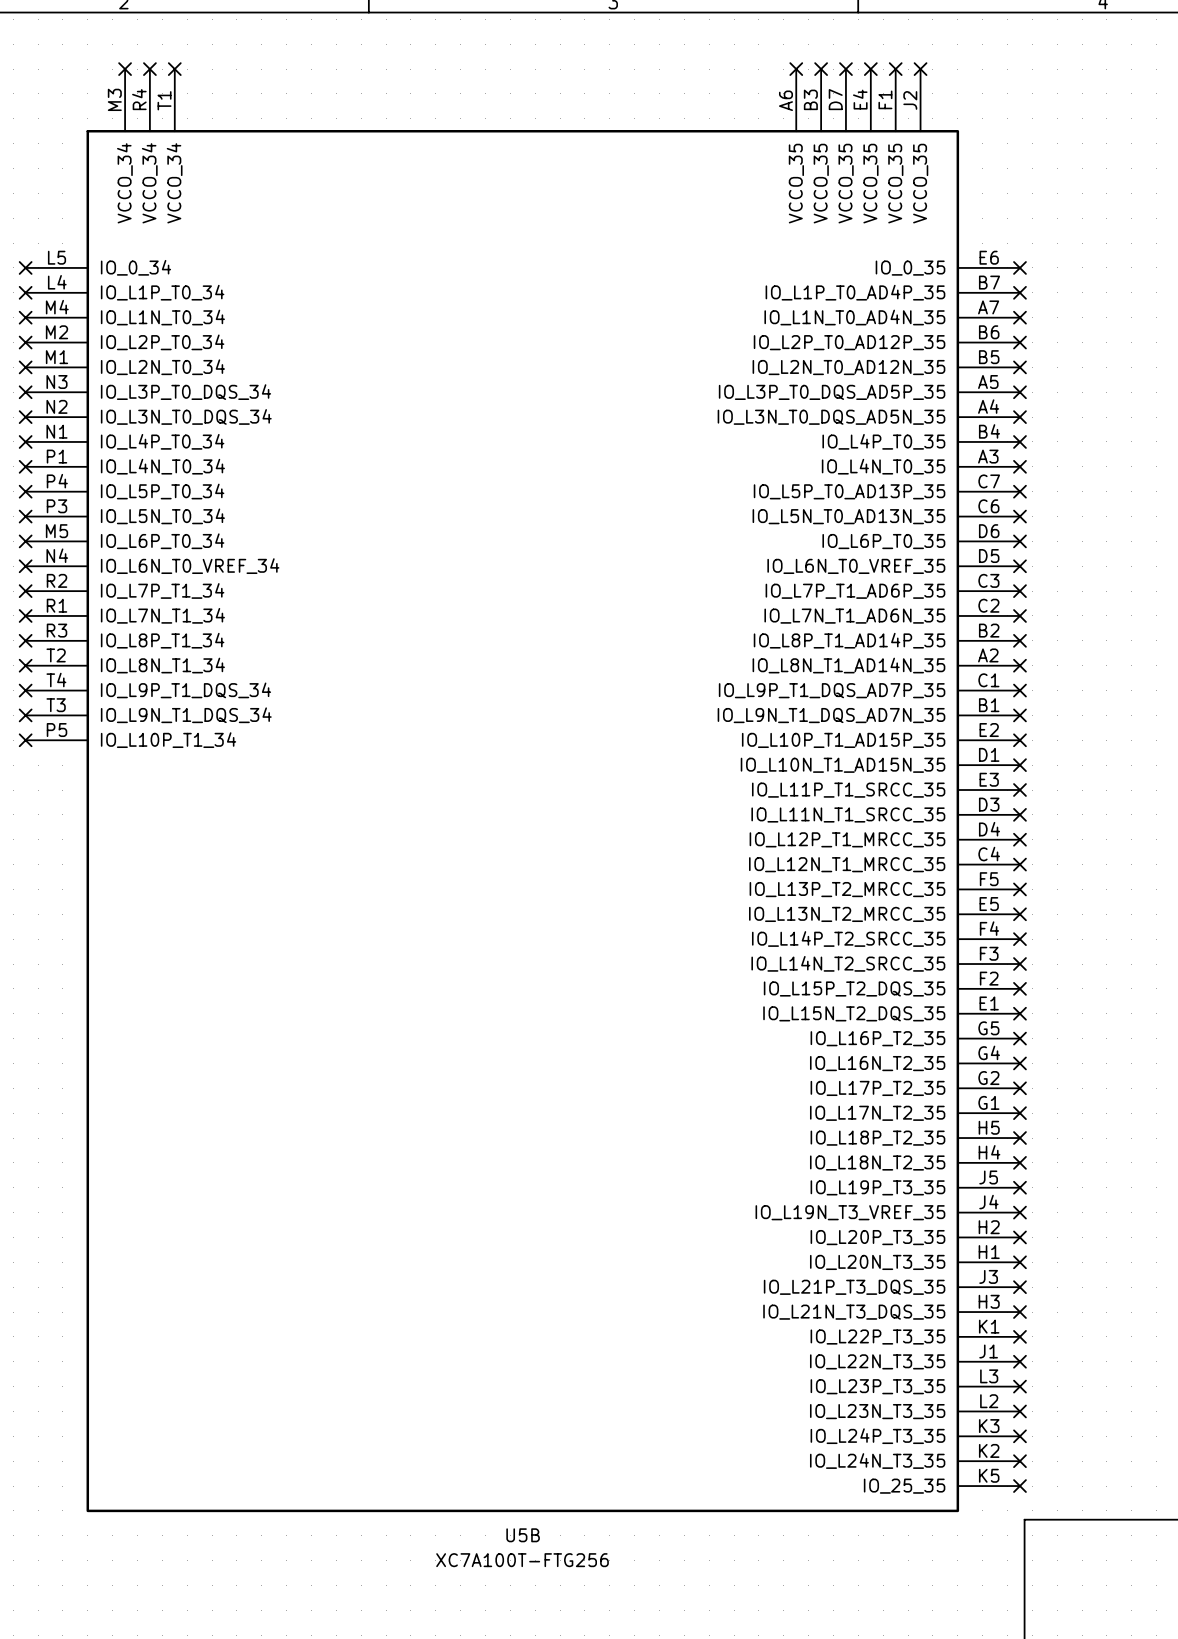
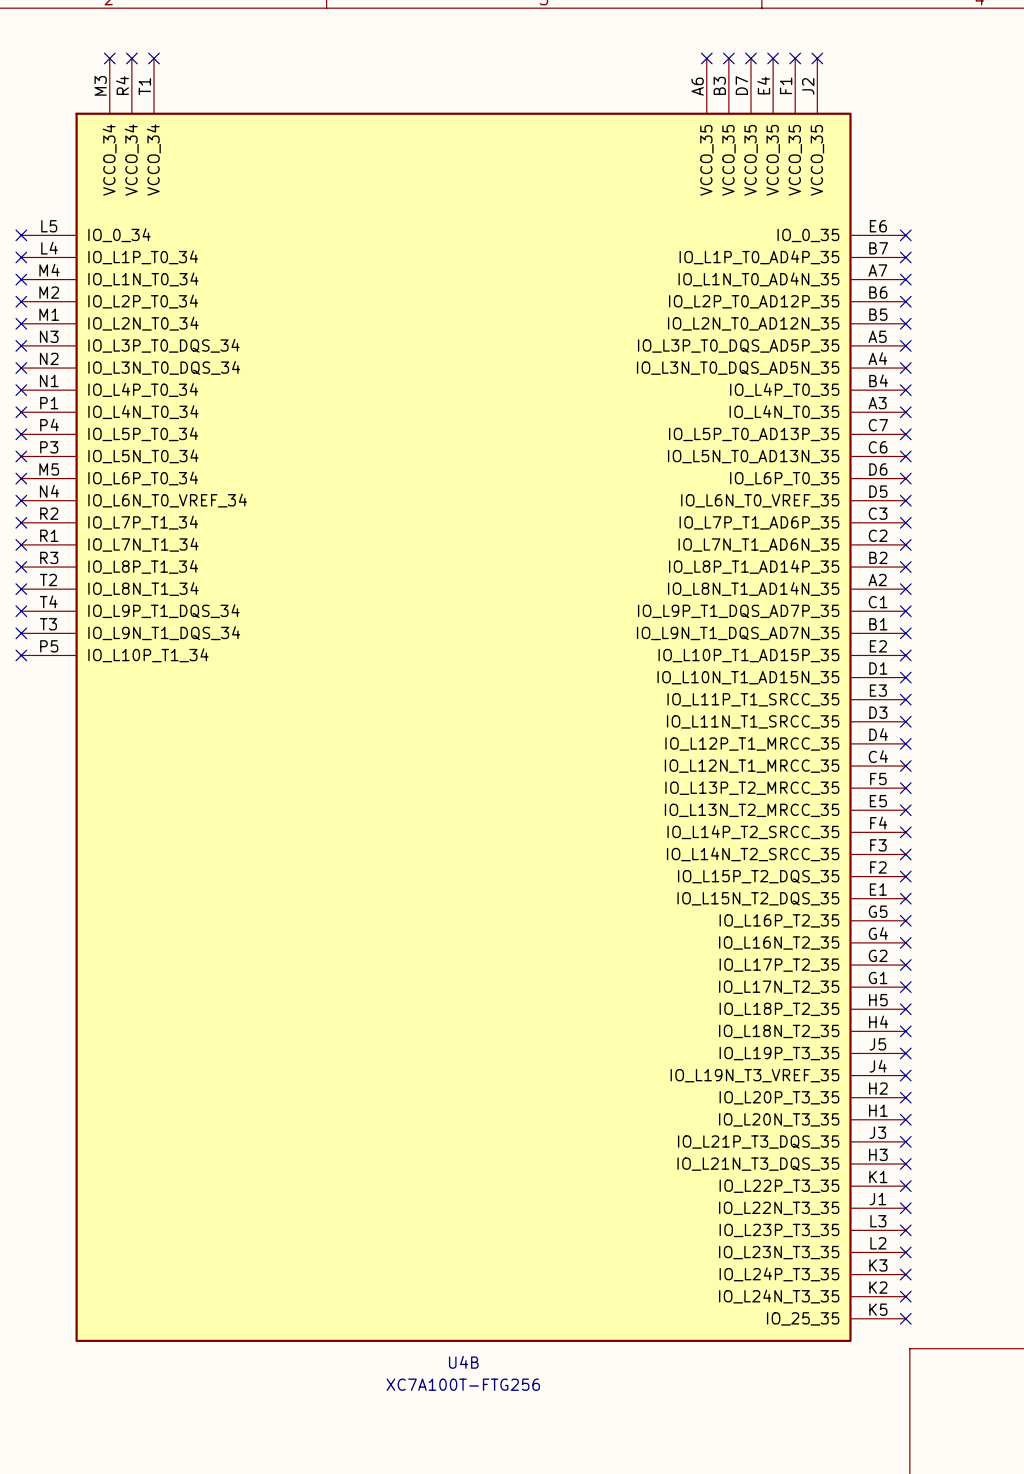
U5B name: U5B (523, 1535) -> U4B (463, 1362)

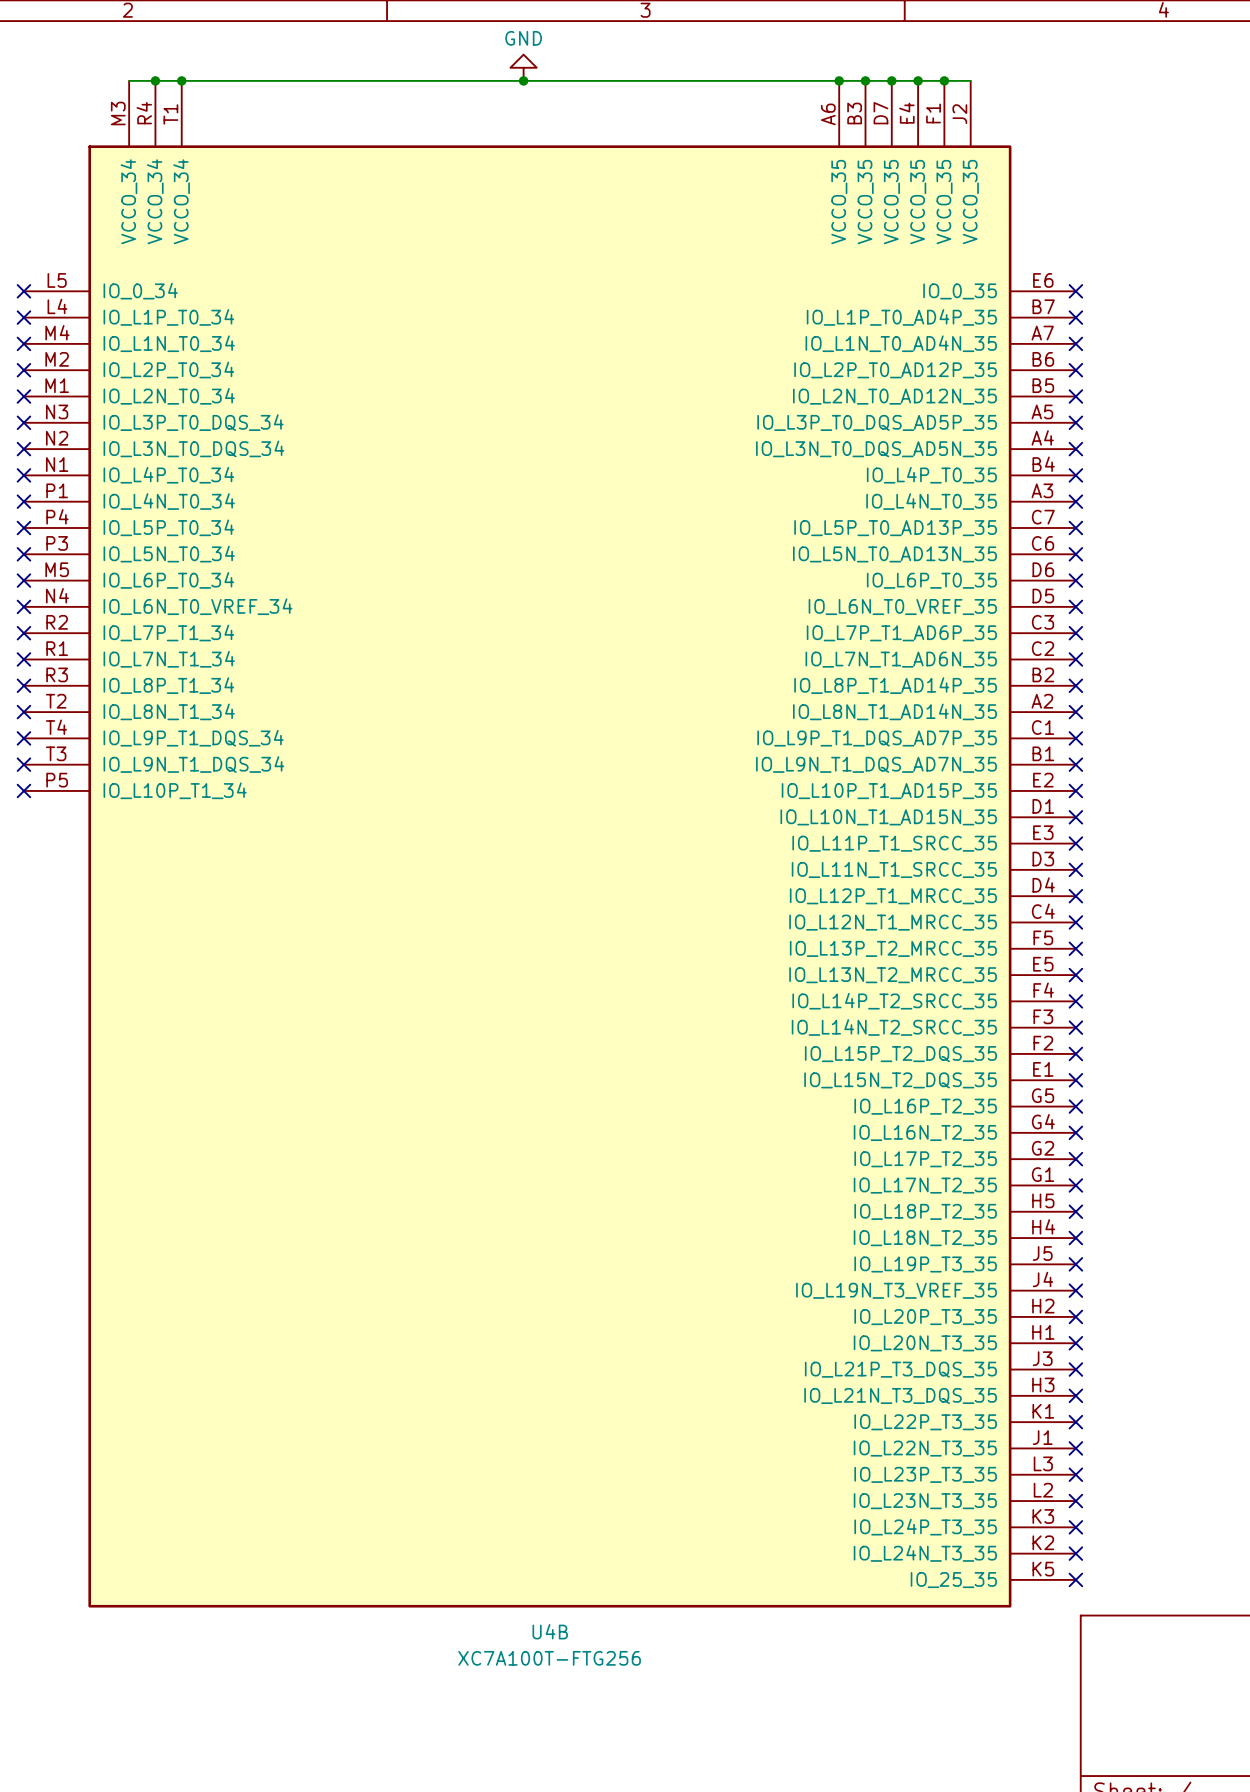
power symbol: none -> GND (523, 67)
wire: none -> (129, 80) (970, 80)
no-connect mark: (109, 58) -> none
no-connect mark: (131, 58) -> none
junction: none -> (155, 80)
no-connect mark: (153, 58) -> none
junction: none -> (181, 80)
junction: none -> (523, 80)
no-connect mark: (706, 58) -> none
junction: none -> (839, 80)
no-connect mark: (728, 58) -> none
junction: none -> (865, 80)
no-connect mark: (750, 58) -> none
junction: none -> (891, 80)
no-connect mark: (773, 58) -> none
junction: none -> (918, 80)
no-connect mark: (795, 58) -> none
junction: none -> (944, 80)
no-connect mark: (817, 58) -> none

